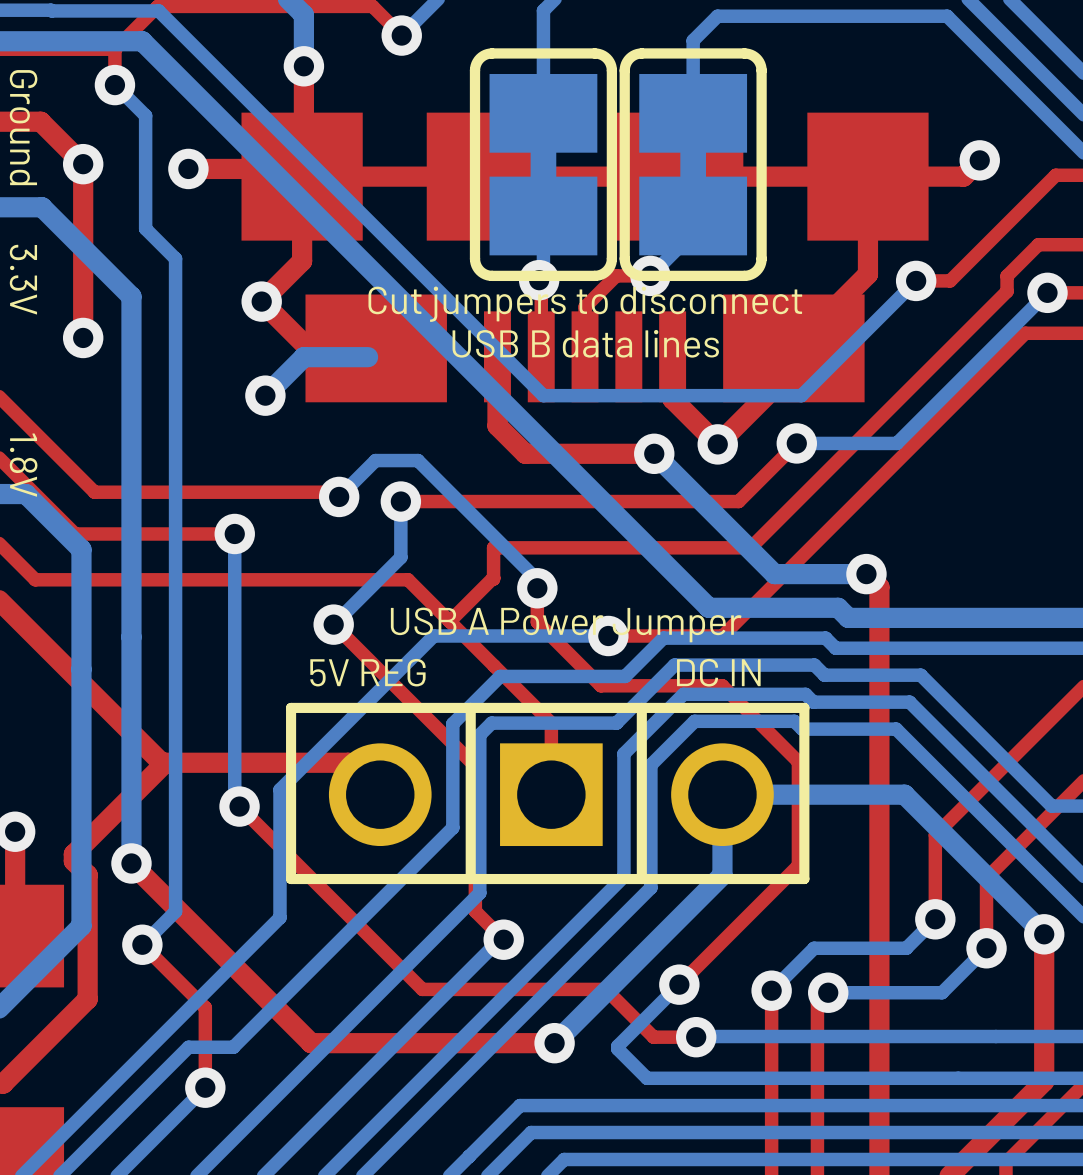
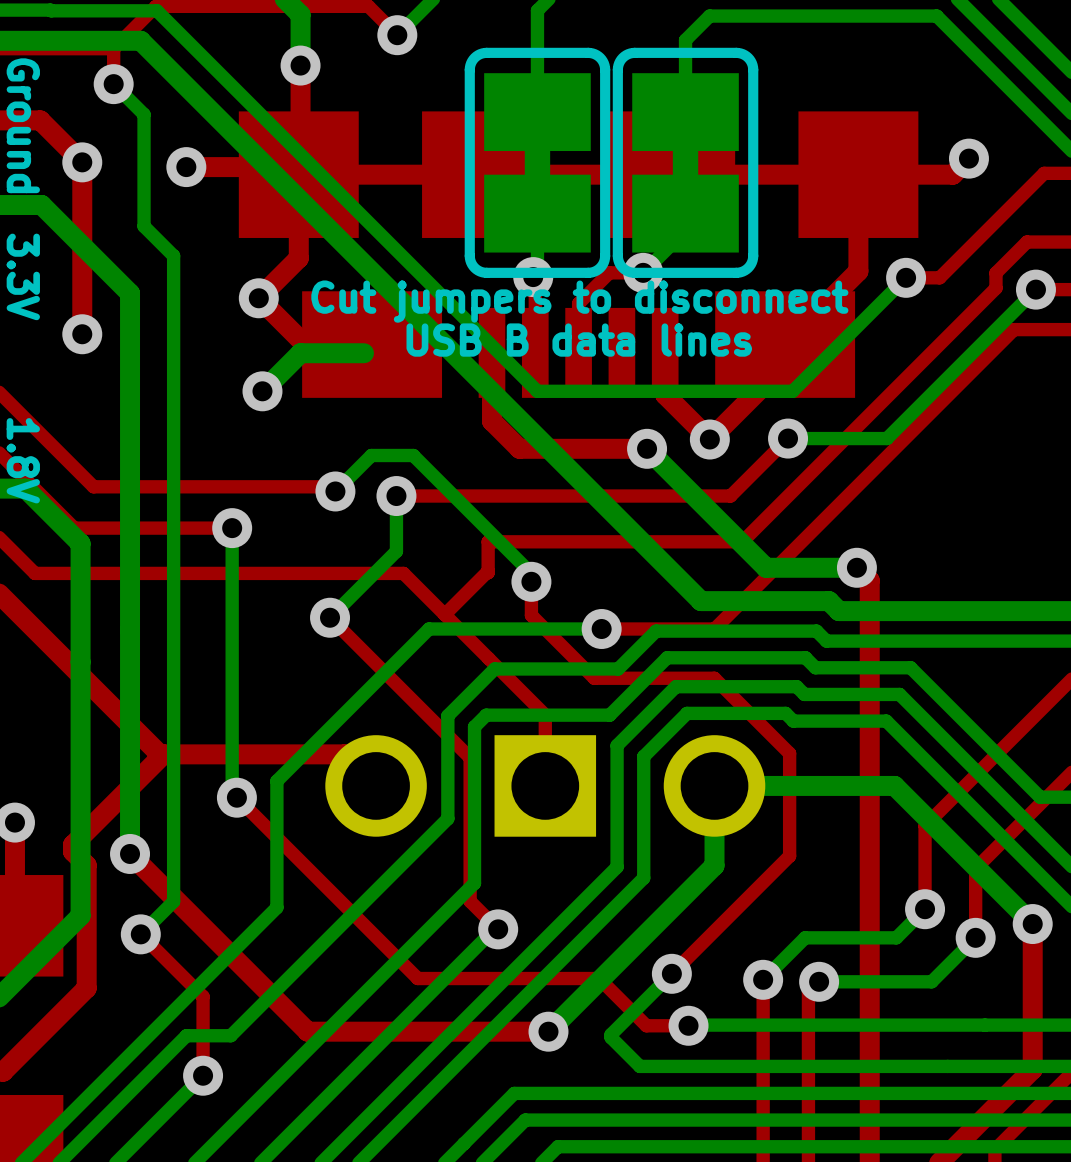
text: USB A Power Jumper (566, 624) -> none
text: 5V REG (367, 672) -> none
text: DC IN (718, 672) -> none
line: (470, 707) (470, 879) -> none
line: (641, 707) (641, 879) -> none
line: (804, 707) (804, 879) (291, 879) (291, 707) (804, 707) -> none

